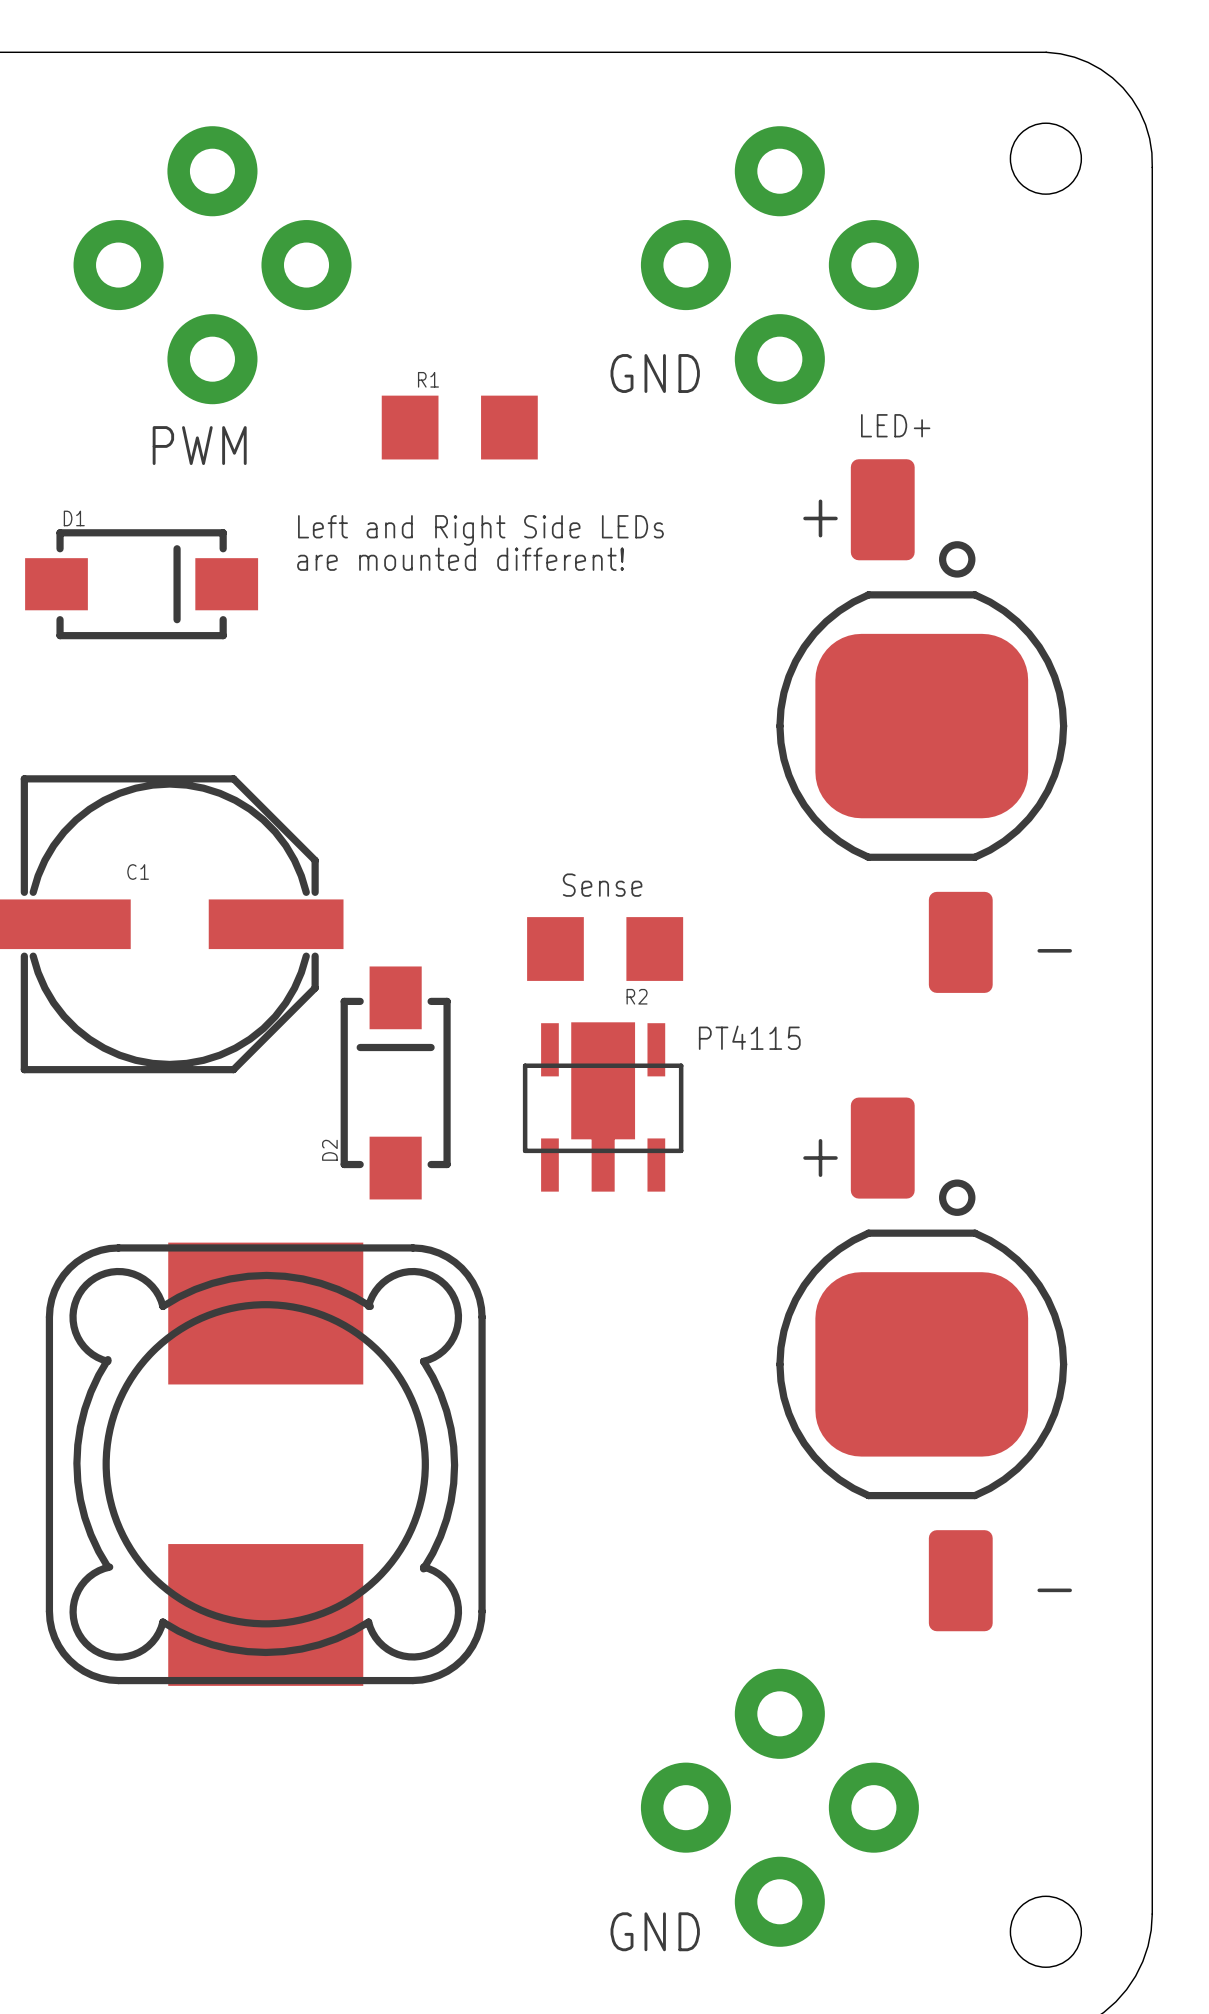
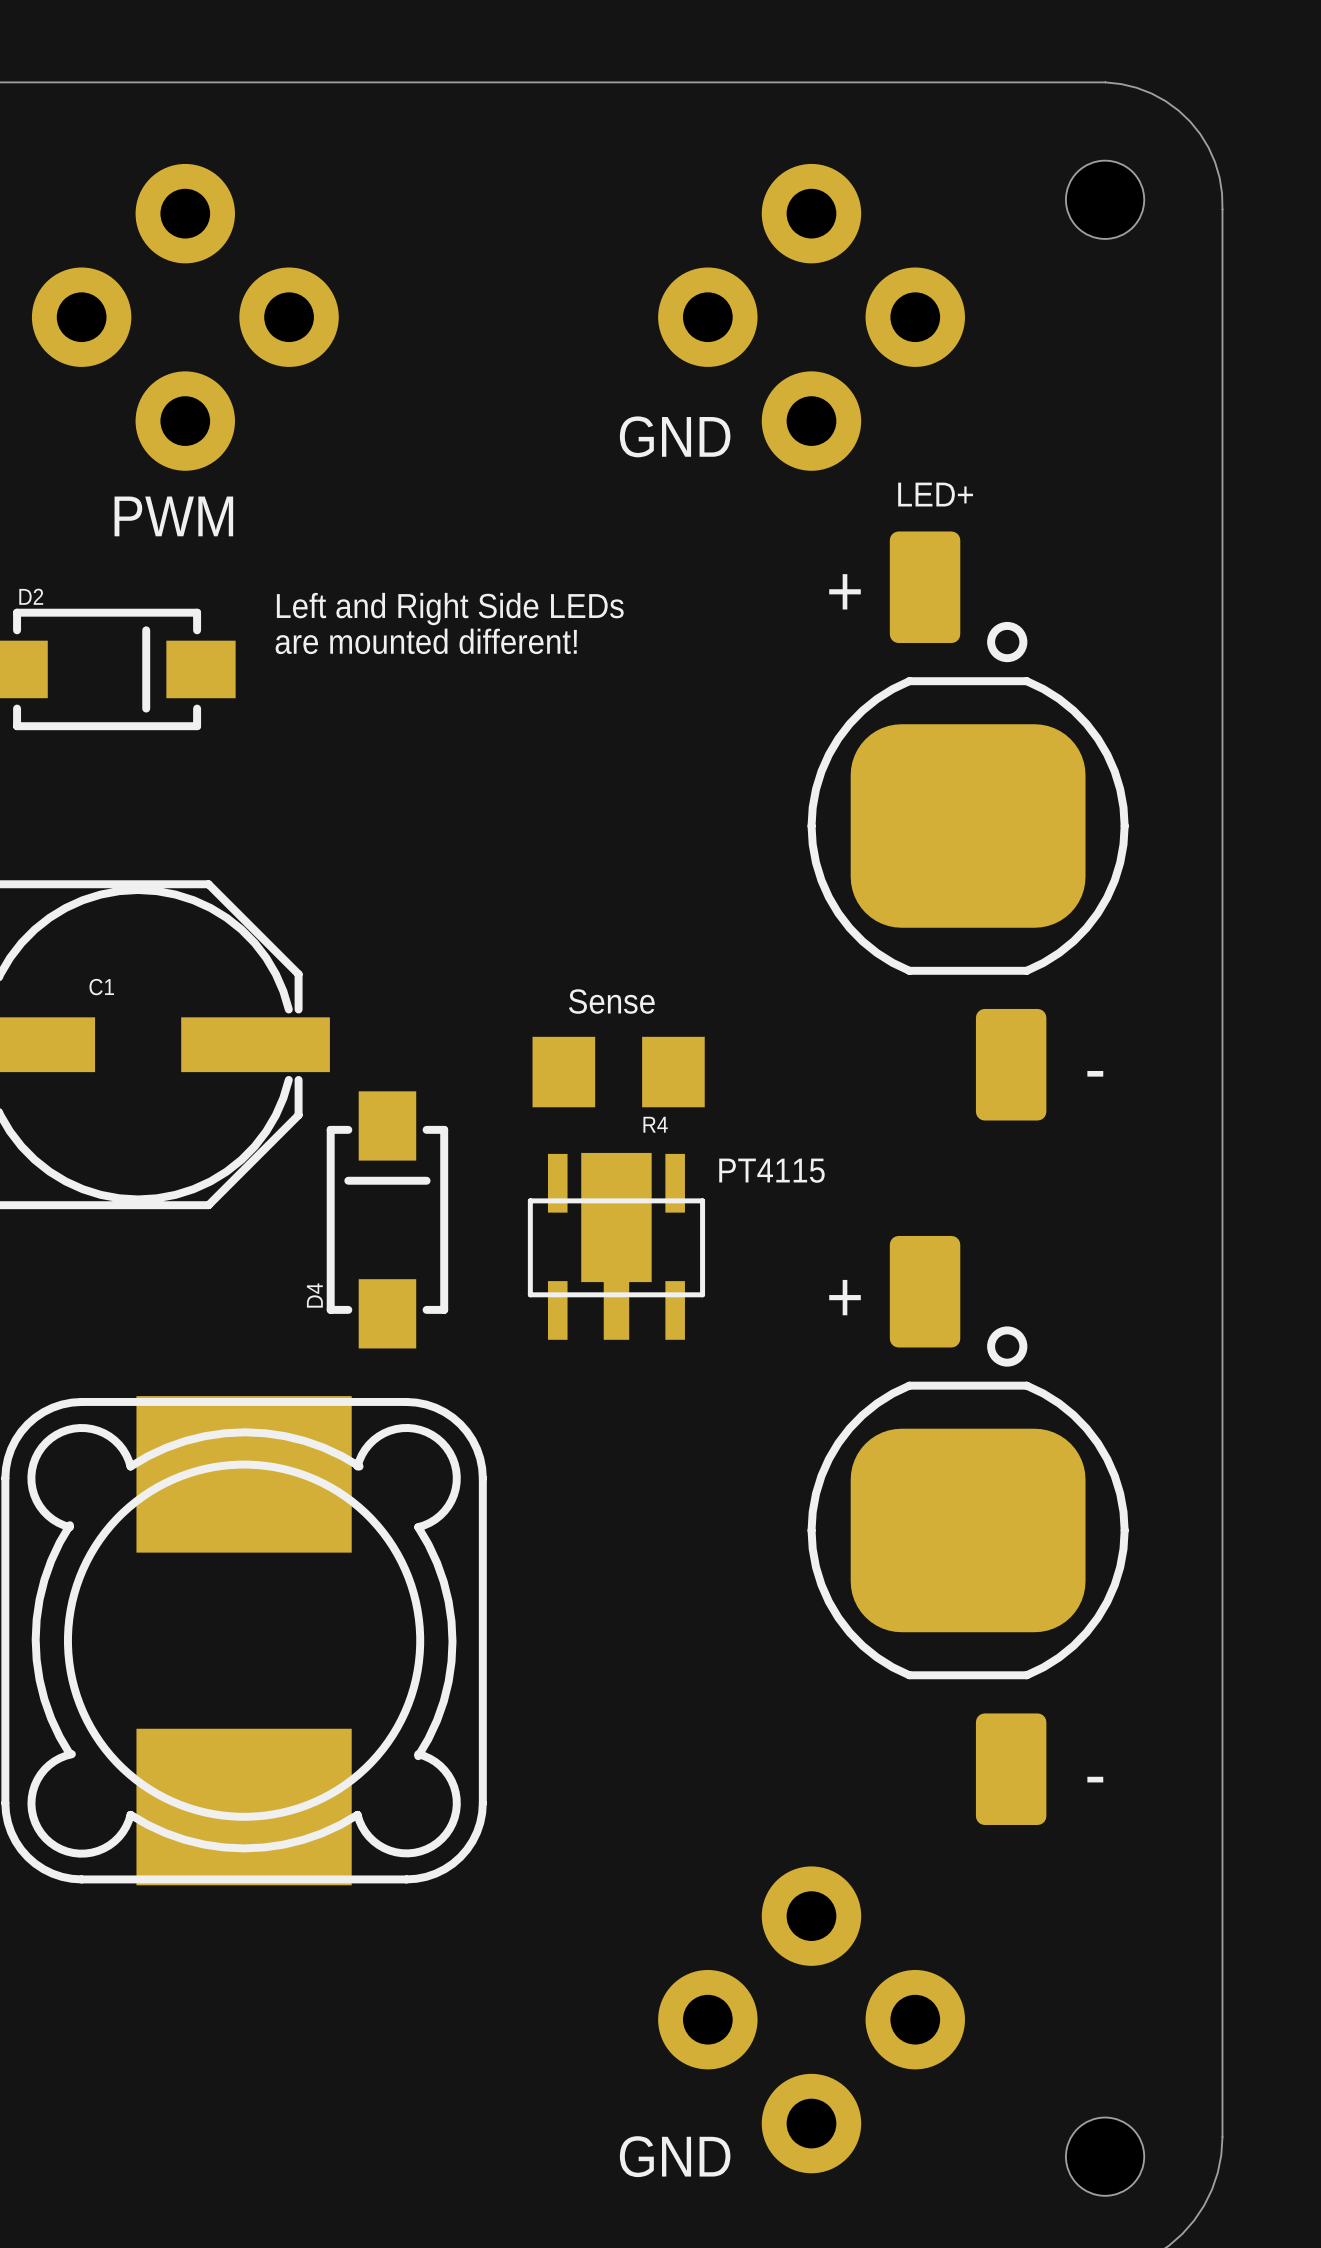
R1: (459, 427) -> none
D1 name: D1 (74, 518) -> D2 (31, 596)
R2 name: R2 (637, 996) -> R4 (655, 1124)
D2 name: D2 (329, 1150) -> D4 (314, 1295)

